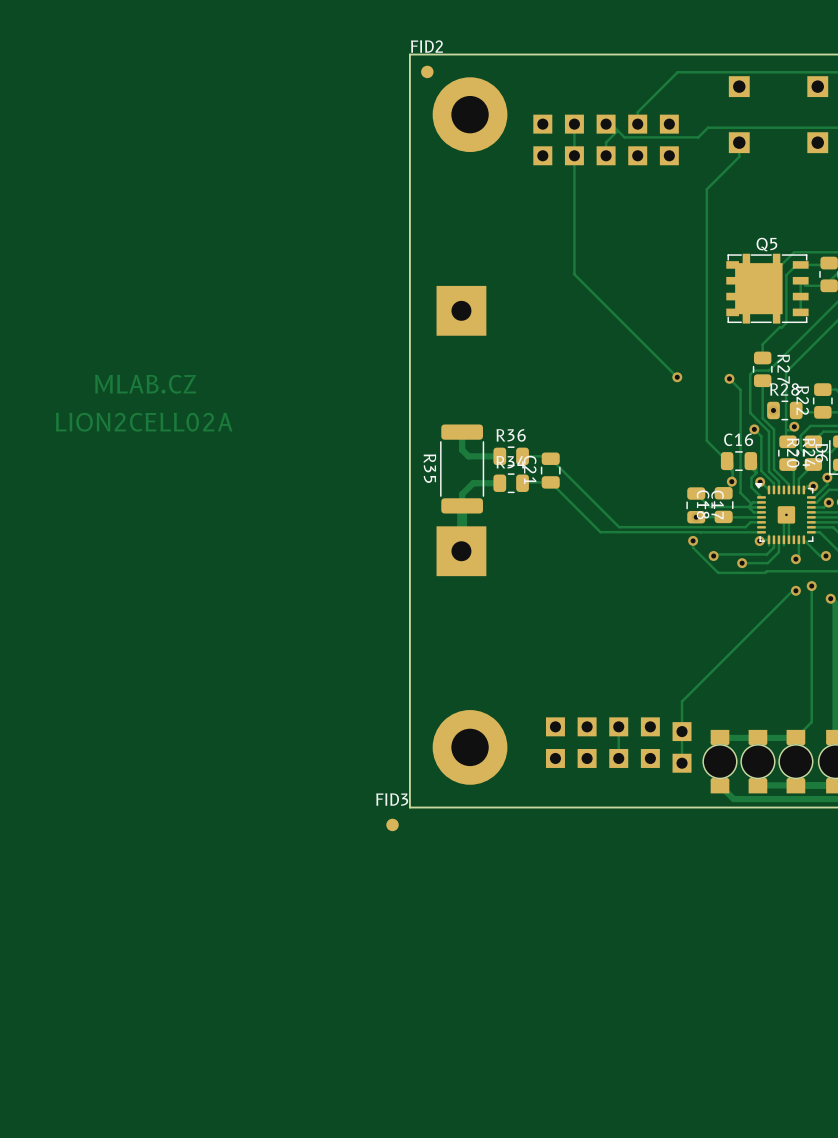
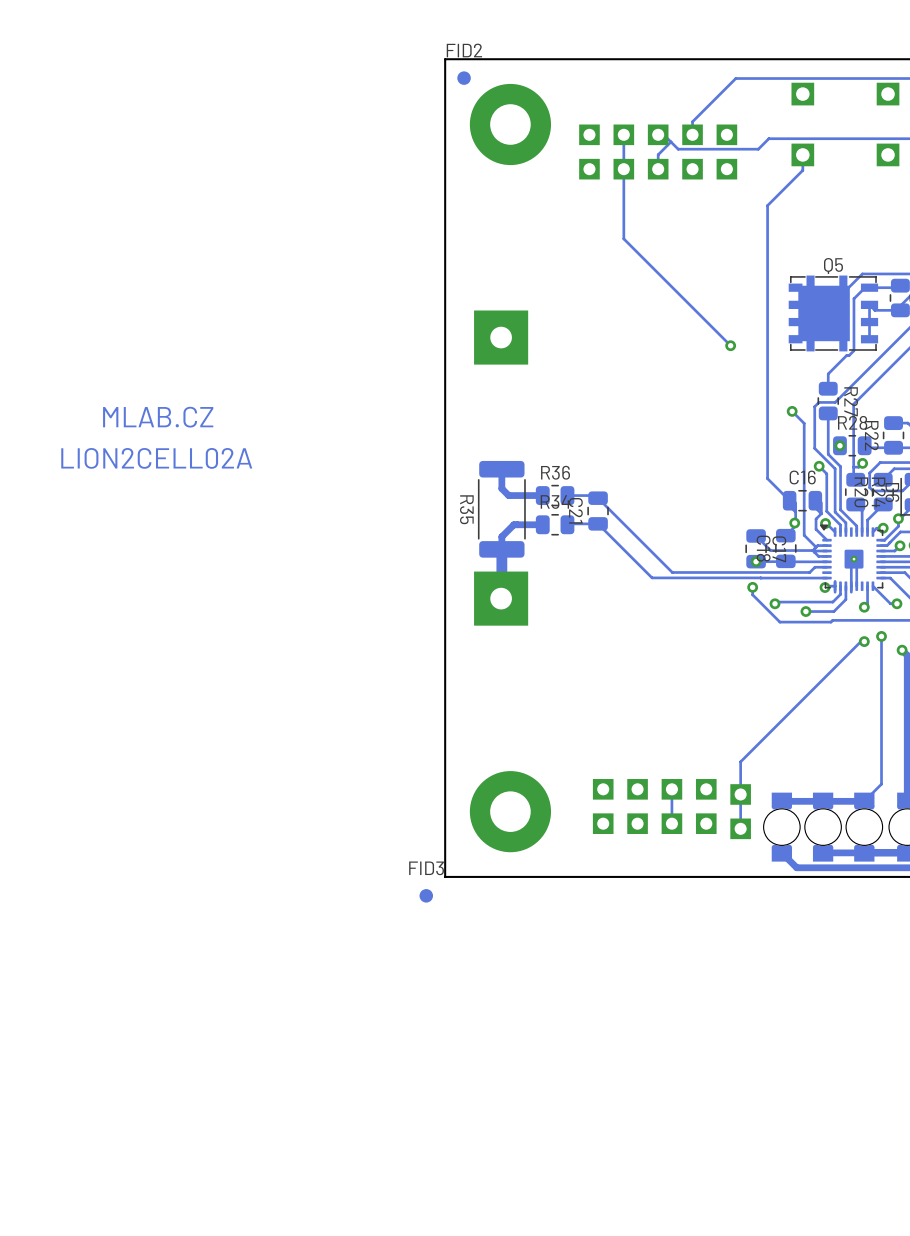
track: (574, 219) (574, 274) (677, 377) -> (623, 238) (730, 345)
via position: (677, 377) -> (730, 345)

